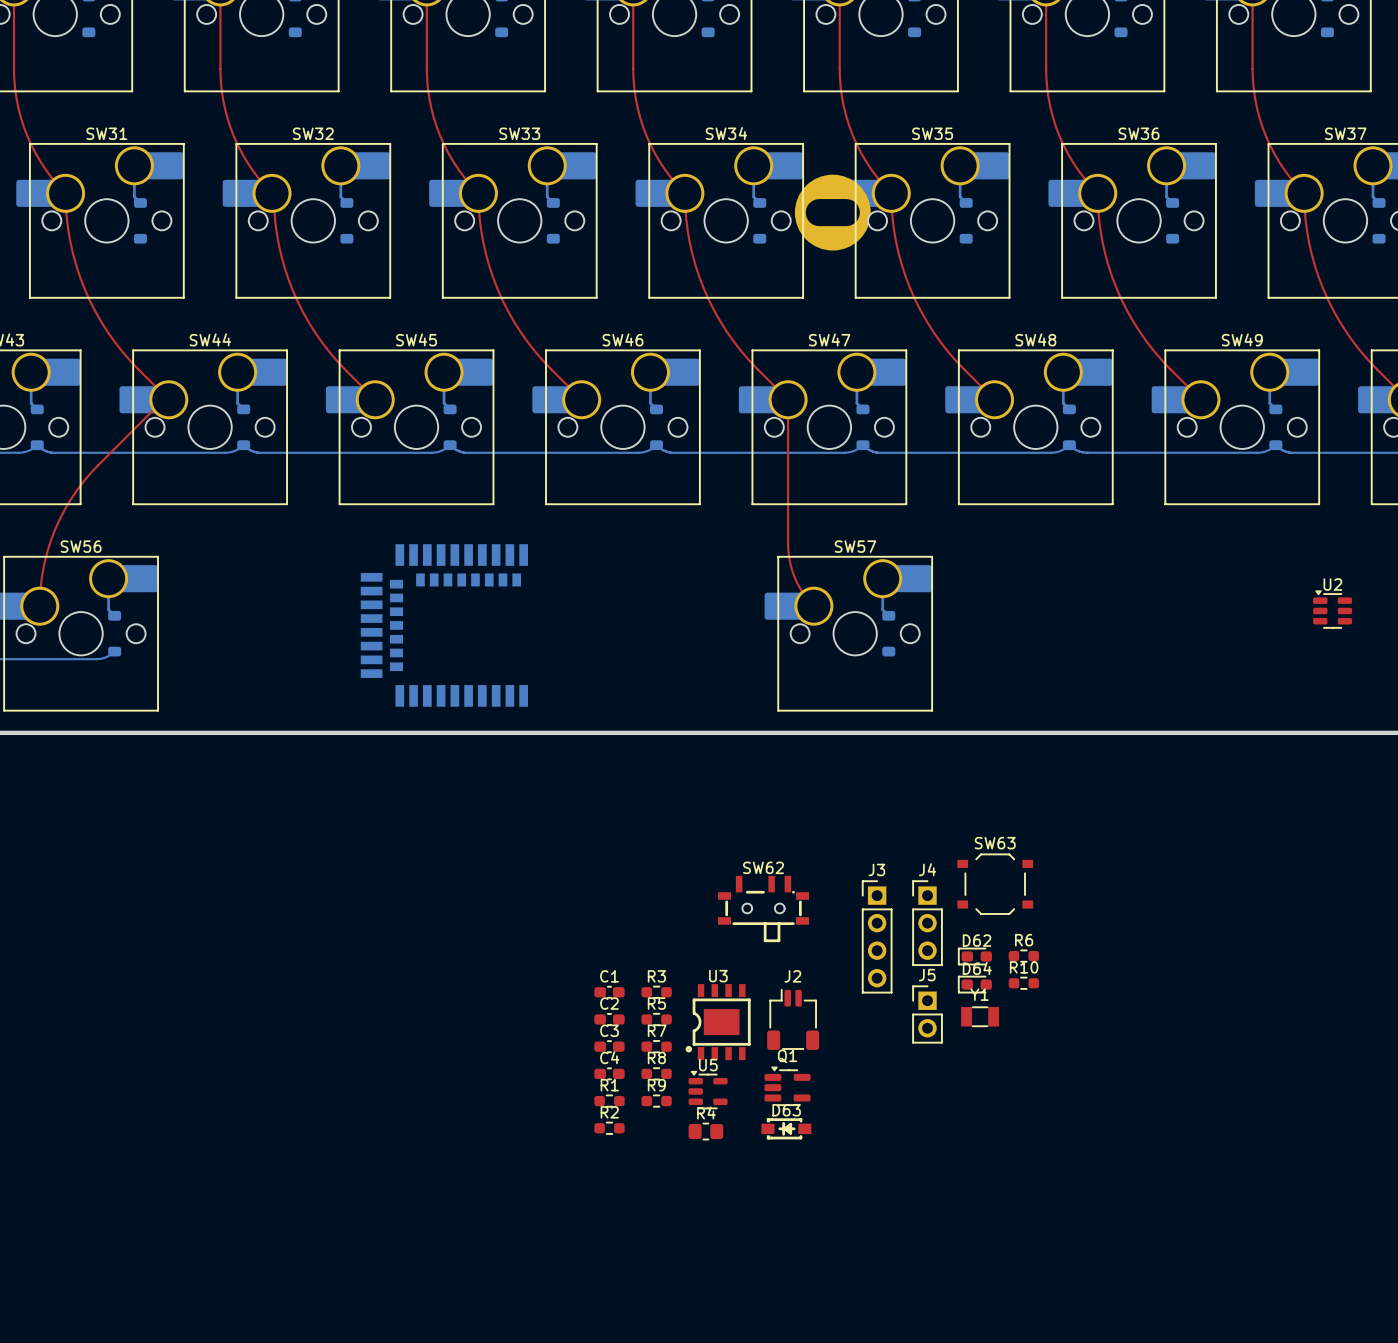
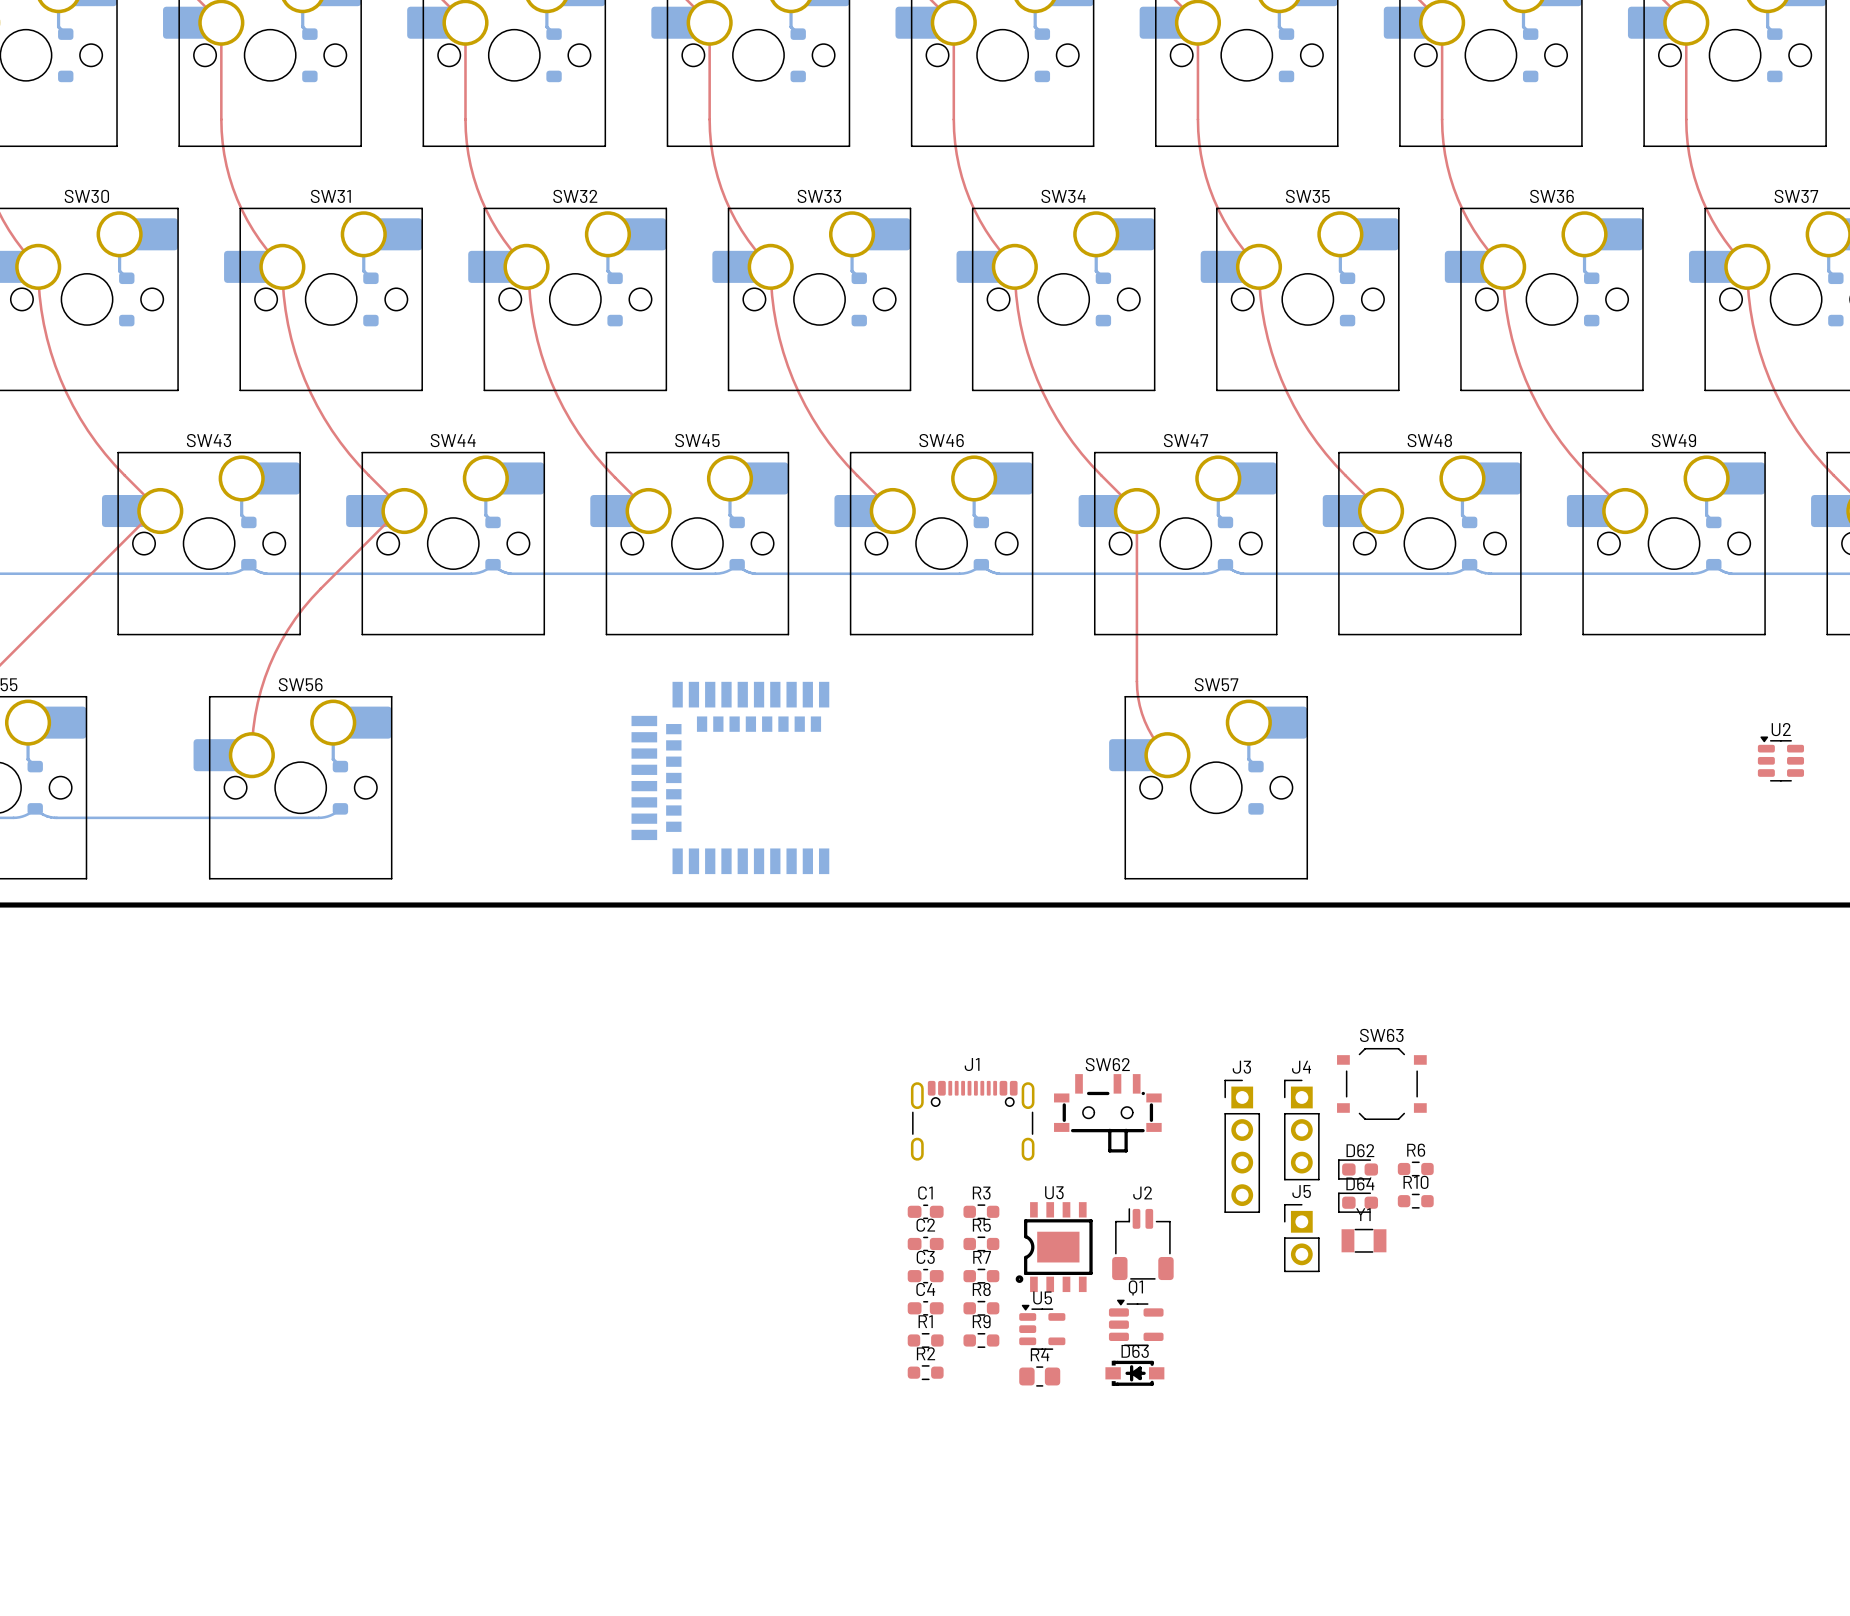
part: (832, 212) -> none
J1: none -> (972, 1120)

